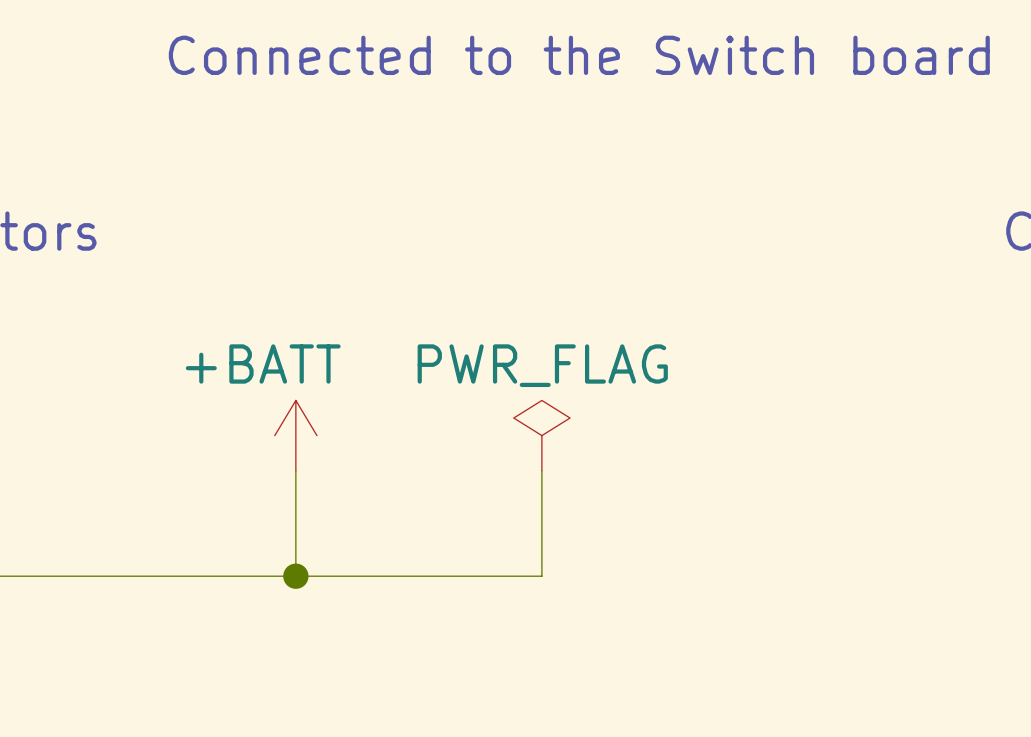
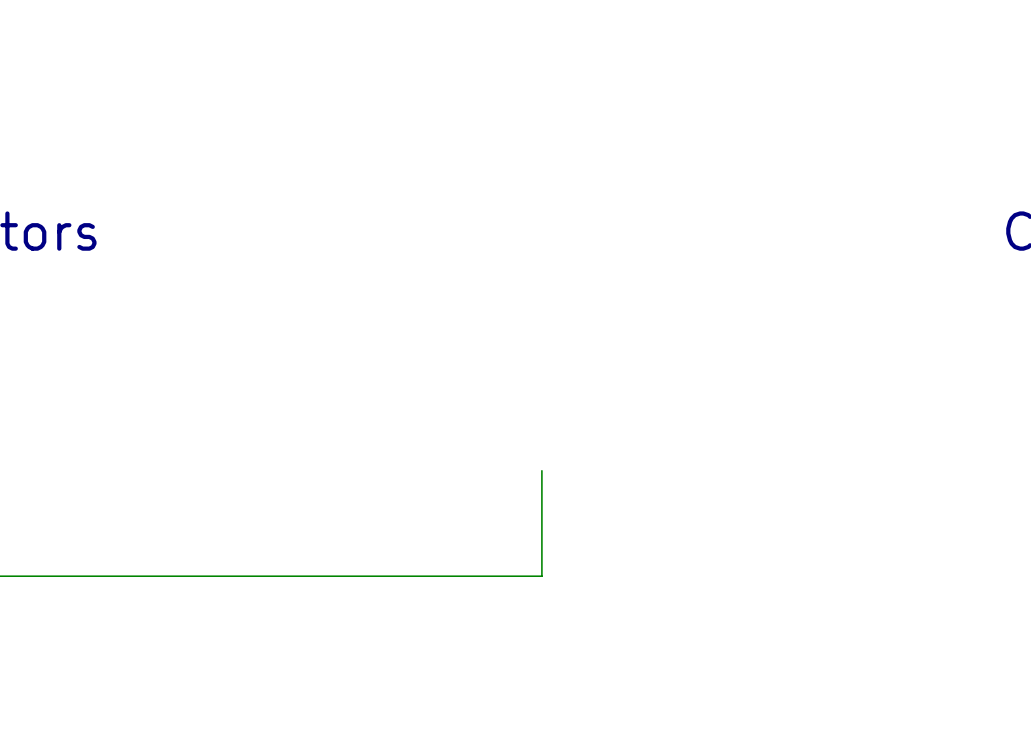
text: Connected to the Switch board (579, 55) -> none
power symbol: +BATT (295, 435) -> none
power symbol: PWR_FLAG (541, 435) -> none
wire: (295, 470) (295, 576) -> none
junction: (295, 576) -> none

